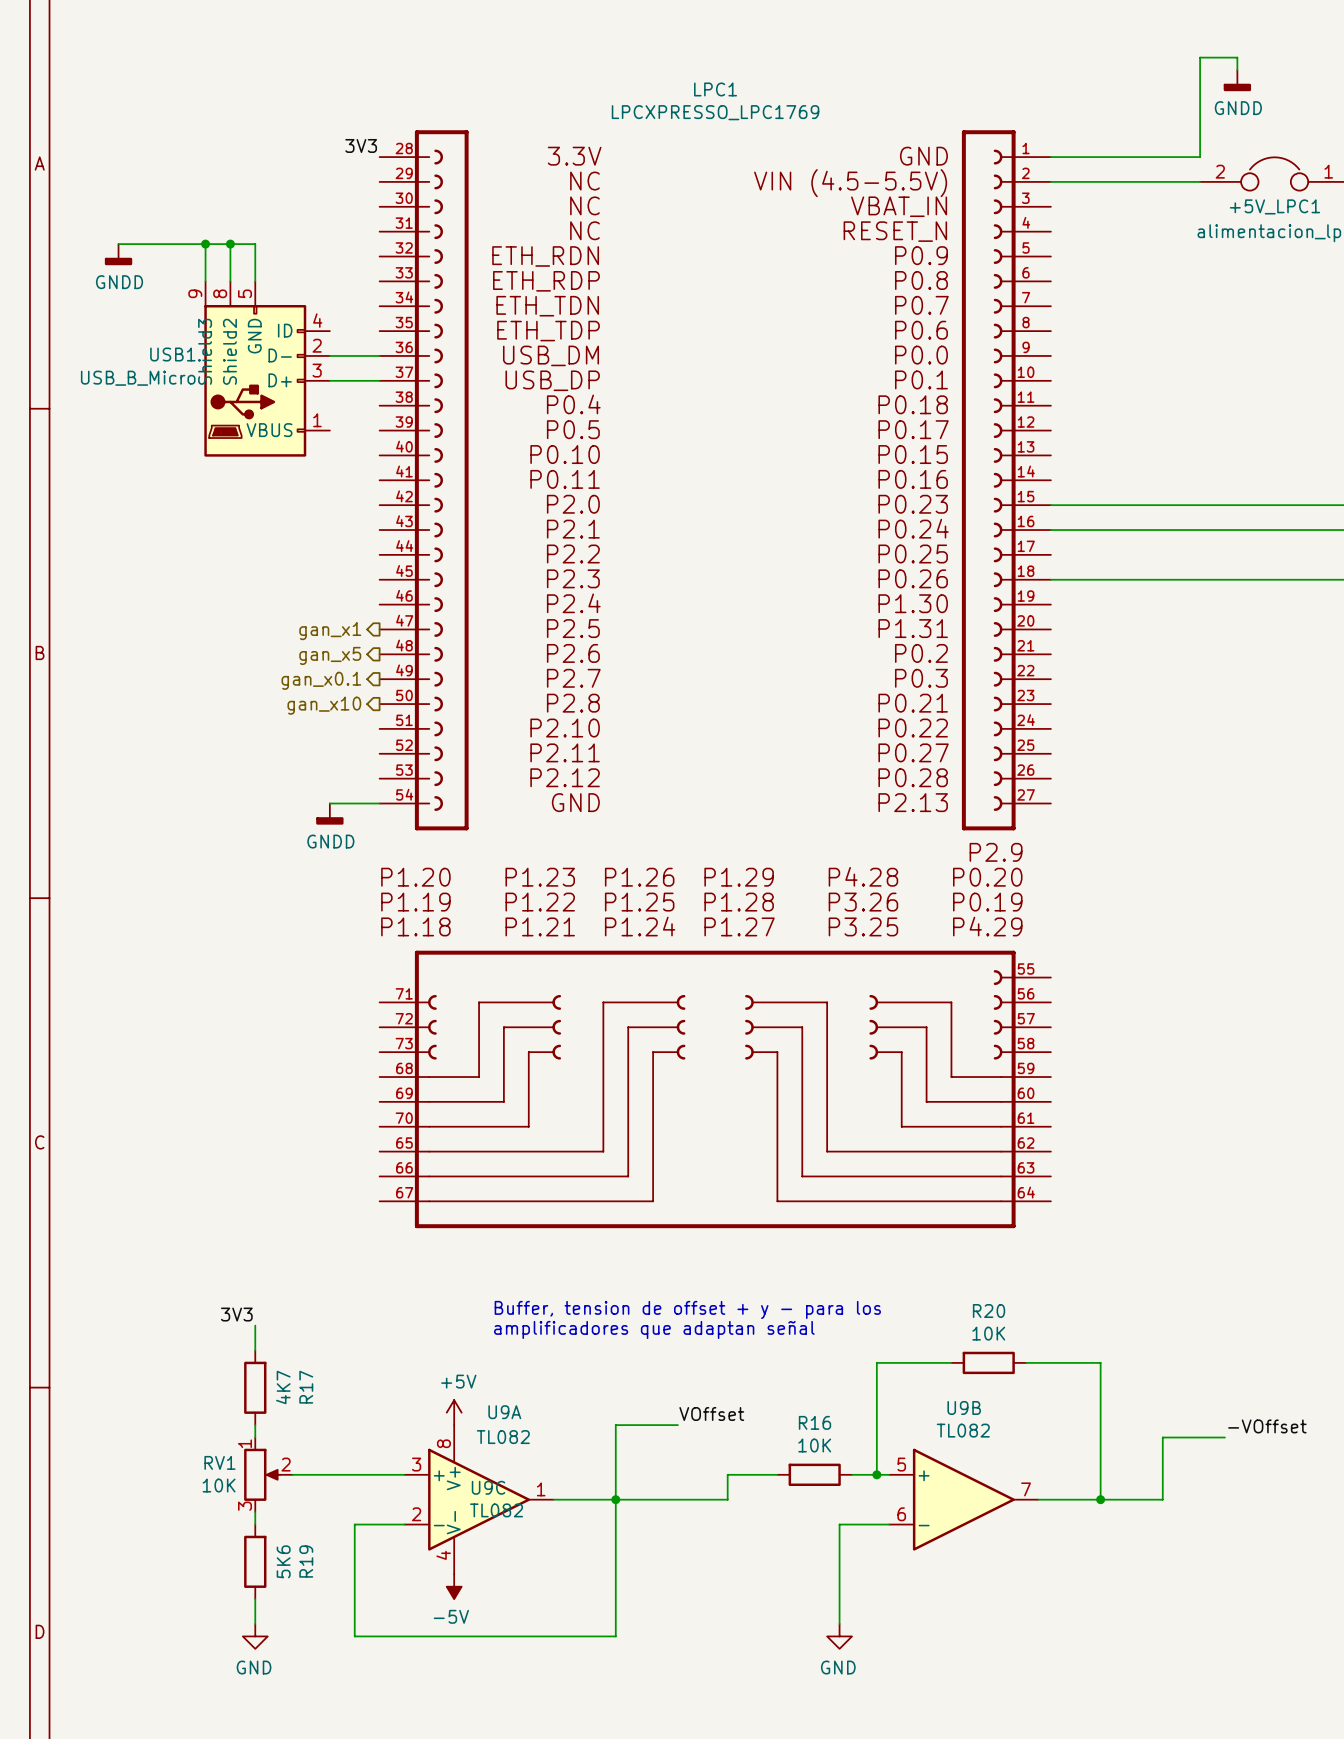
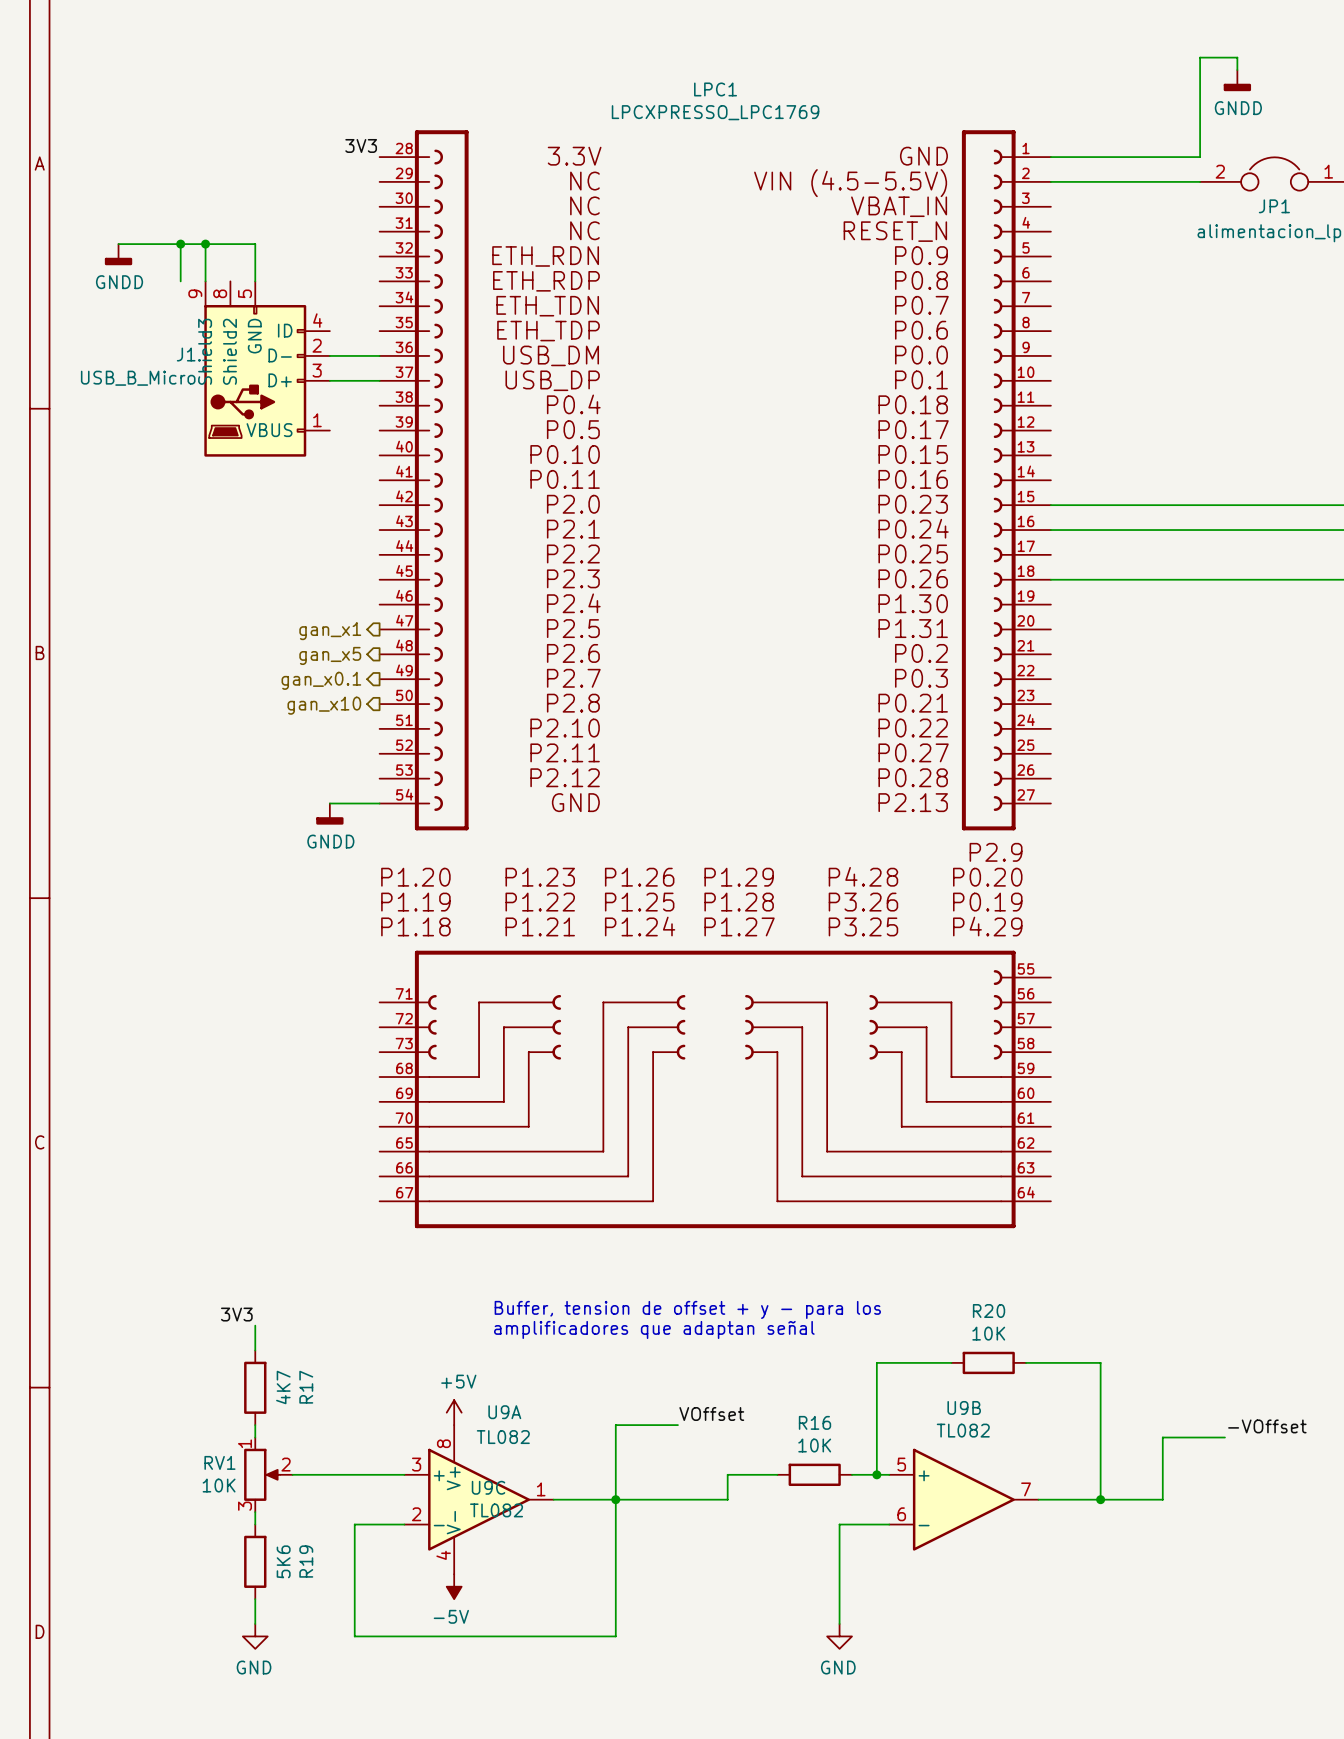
+5V_LPC1 name: +5V_LPC1 (1274, 206) -> JP1 (1274, 206)
wire: (230, 244) (230, 281) -> (180, 244) (180, 281)
junction position: (230, 244) -> (180, 244)
USB1 name: USB1 (172, 354) -> J1 (186, 354)

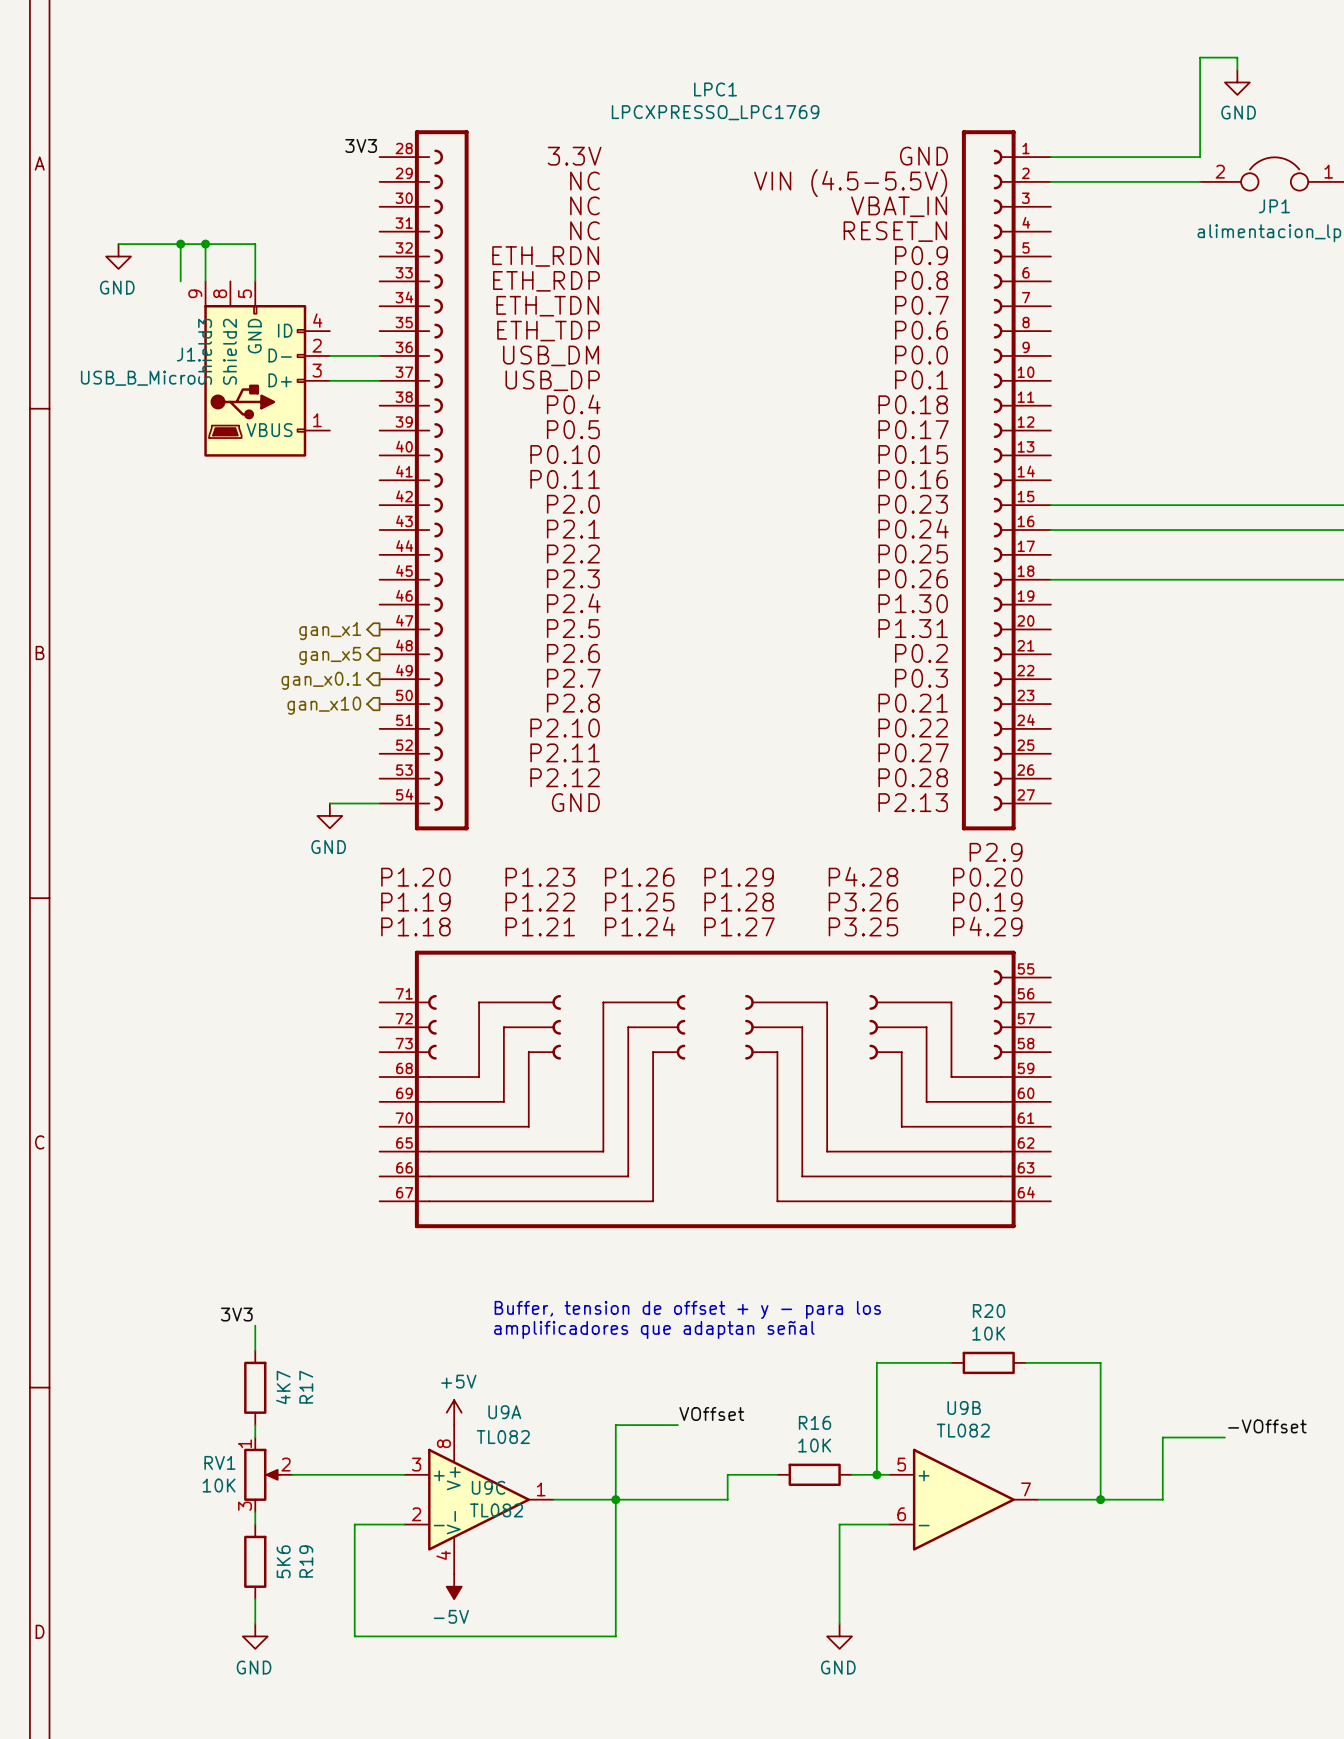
power symbol: GNDD (1237, 80) -> GND (1237, 82)
power symbol: GNDD (118, 254) -> GND (118, 256)
power symbol: GNDD (329, 814) -> GND (329, 815)

